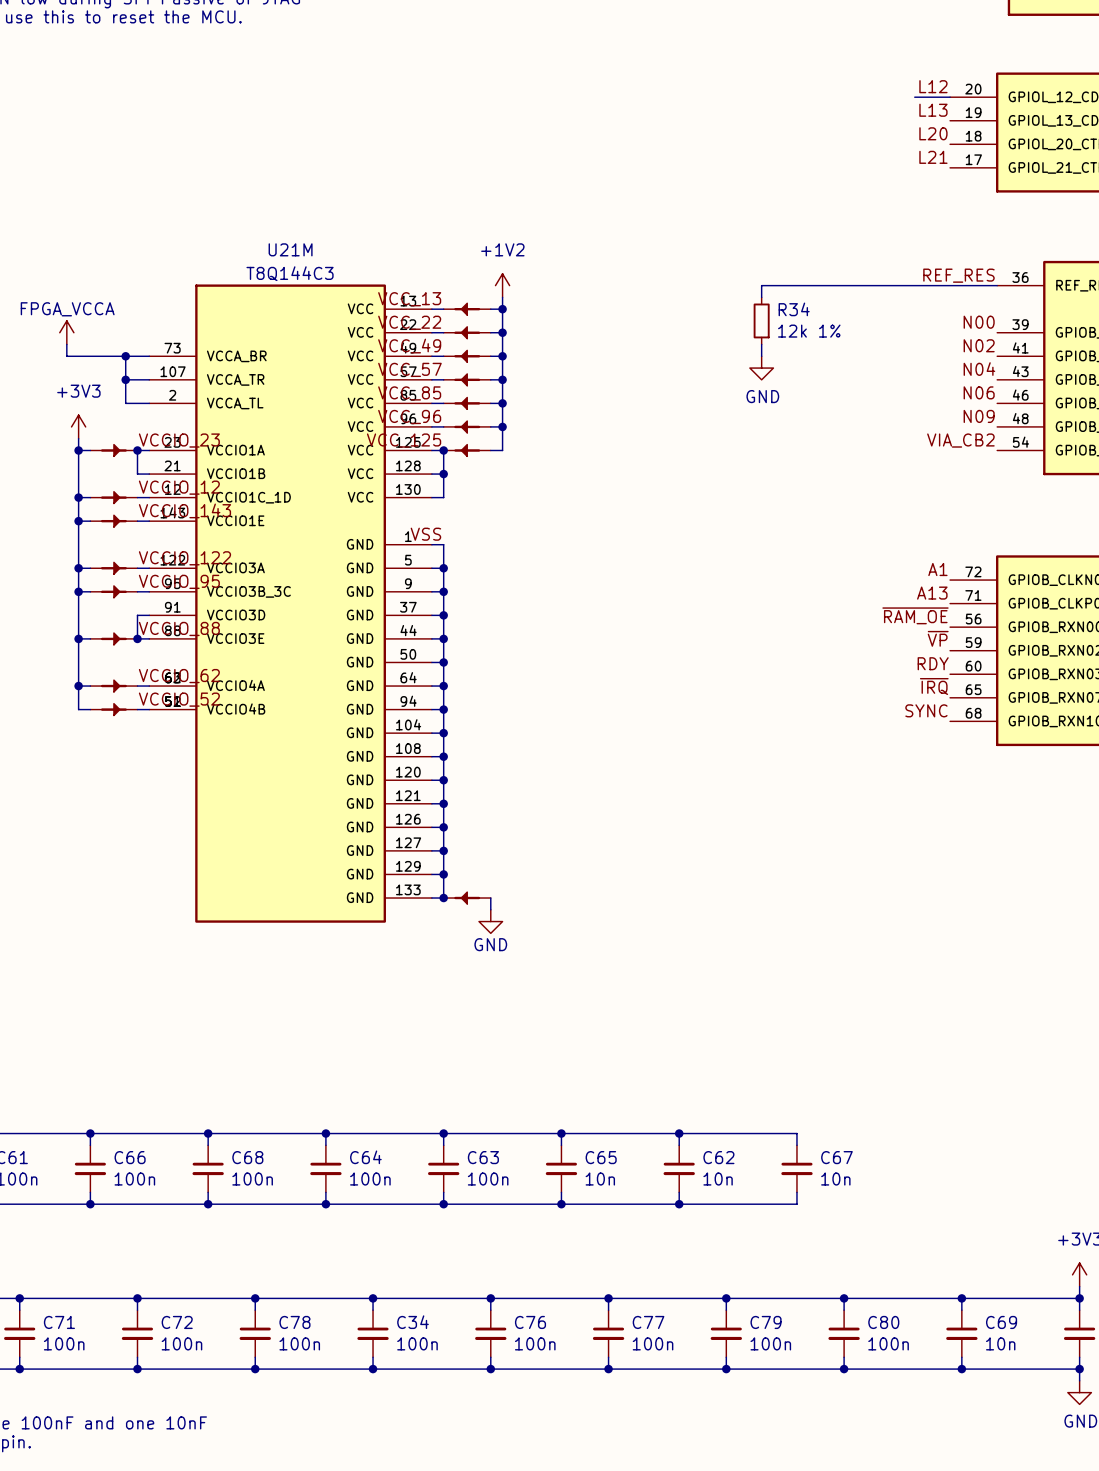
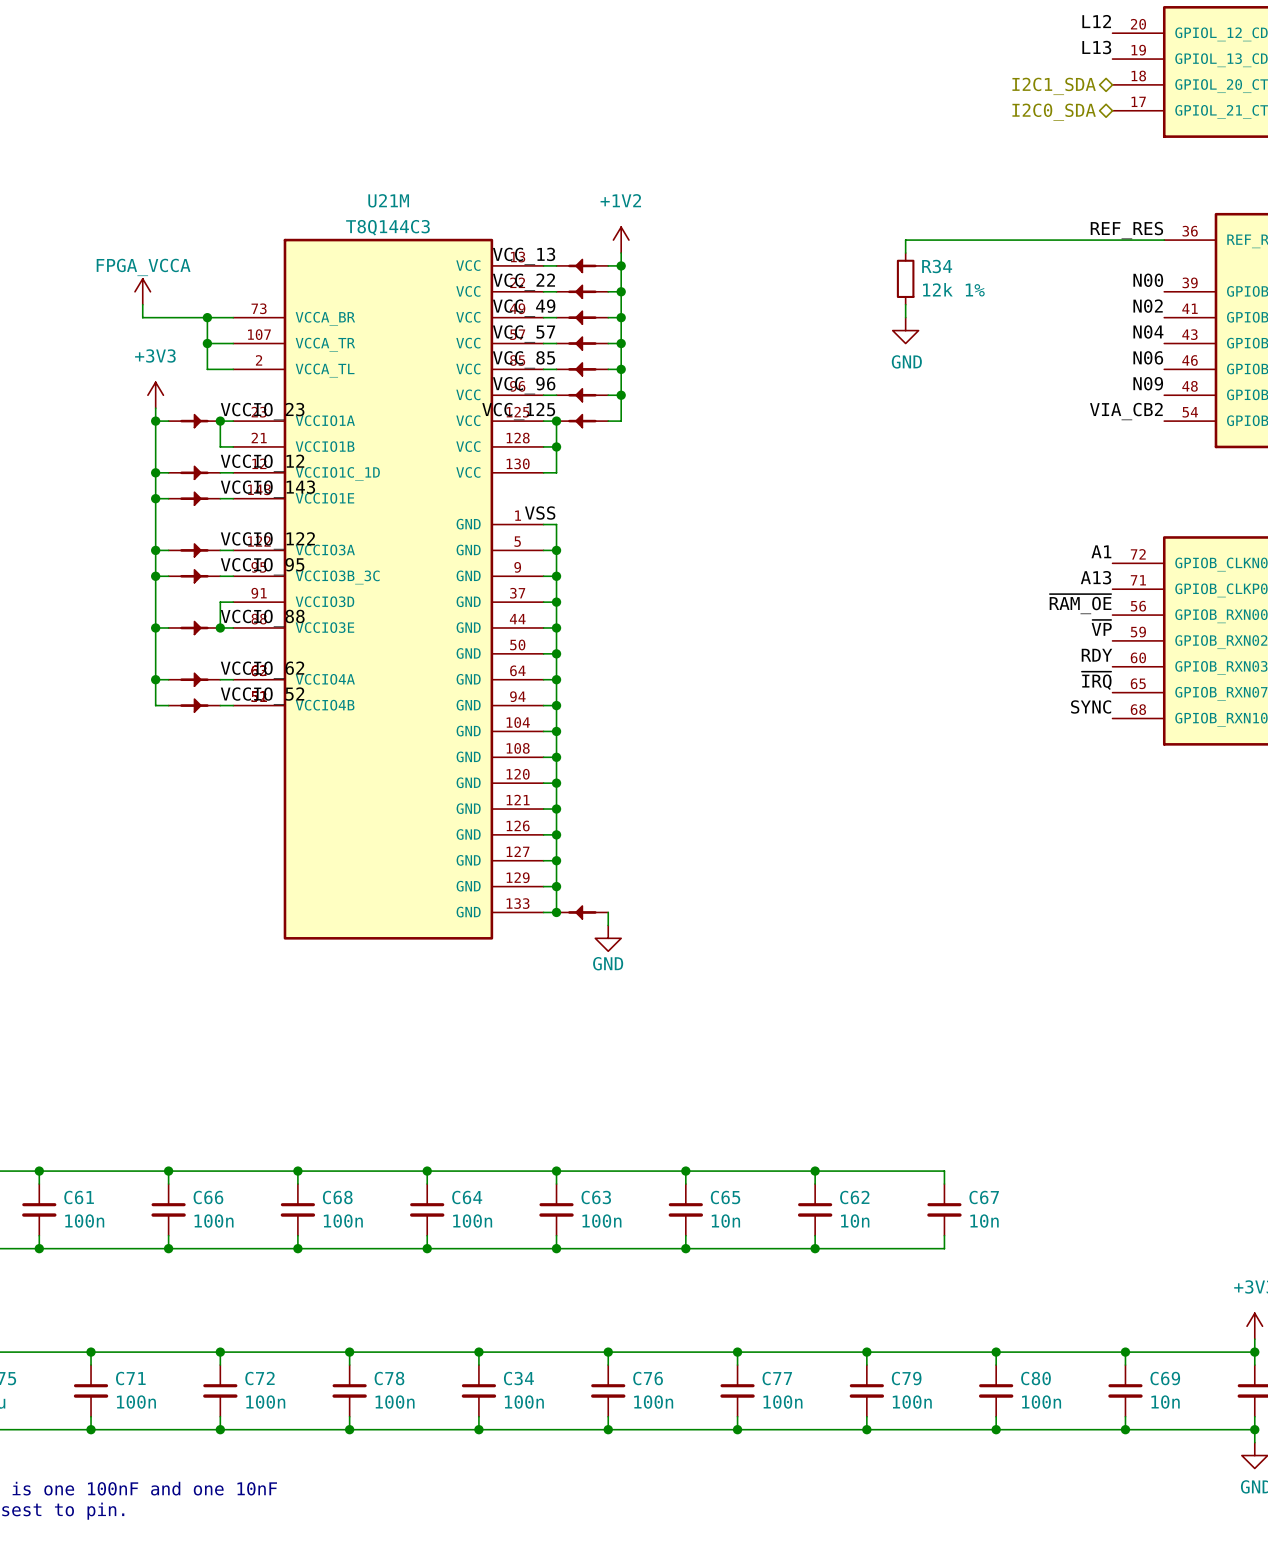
wire: (914, 97) (950, 97) -> none
label: L20 (933, 133) -> none
hierarchical label: none -> I2C1_SDA (1054, 86)
label: L21 (933, 157) -> none
hierarchical label: none -> I2C0_SDA (1054, 112)

